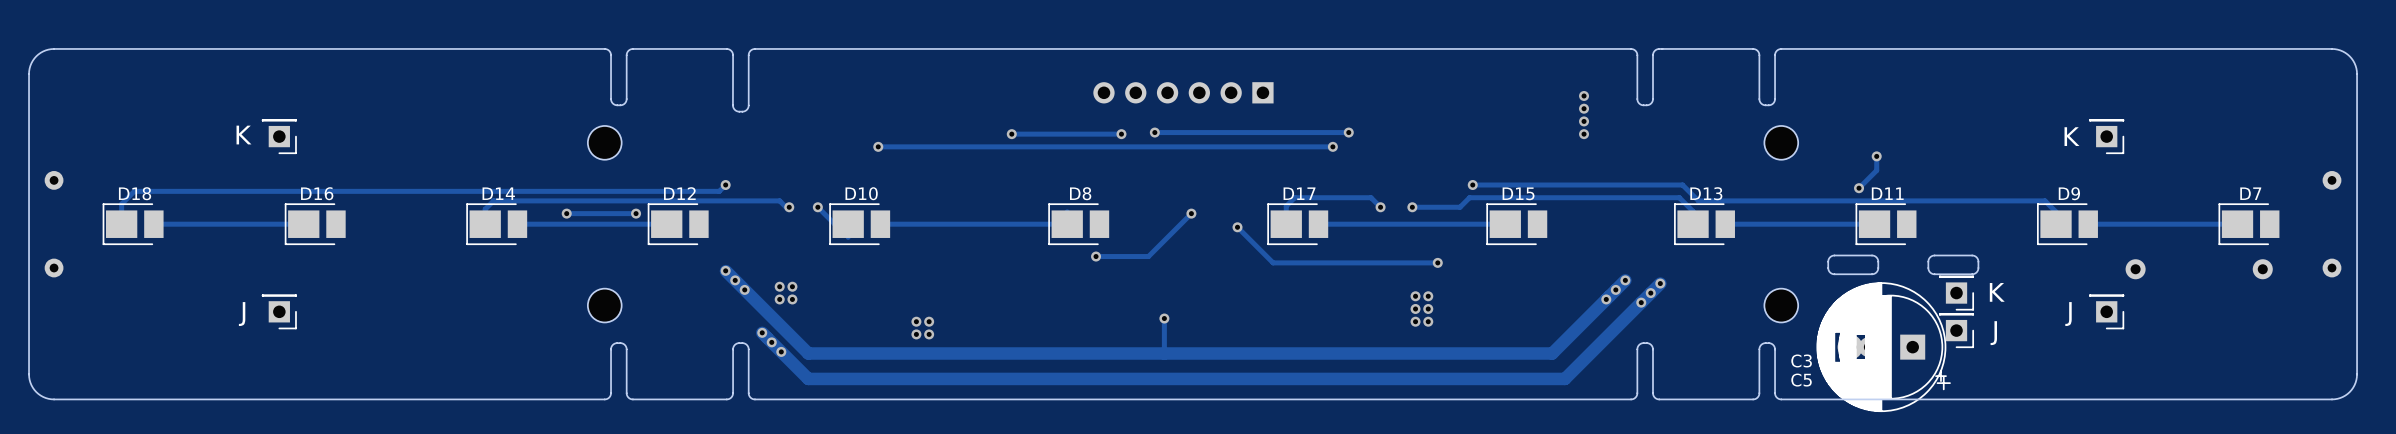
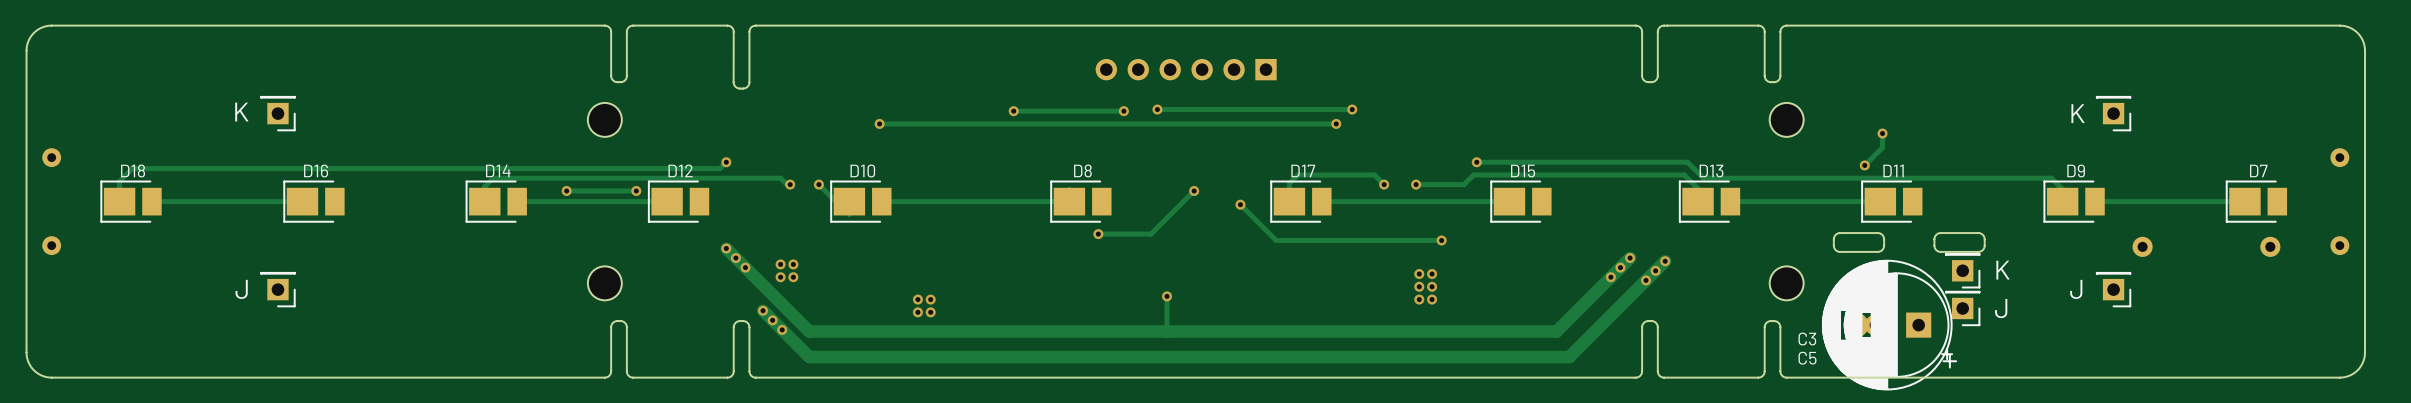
via: (1584, 95) -> none
via: (1584, 108) -> none
via: (1584, 121) -> none
via: (1584, 134) -> none

